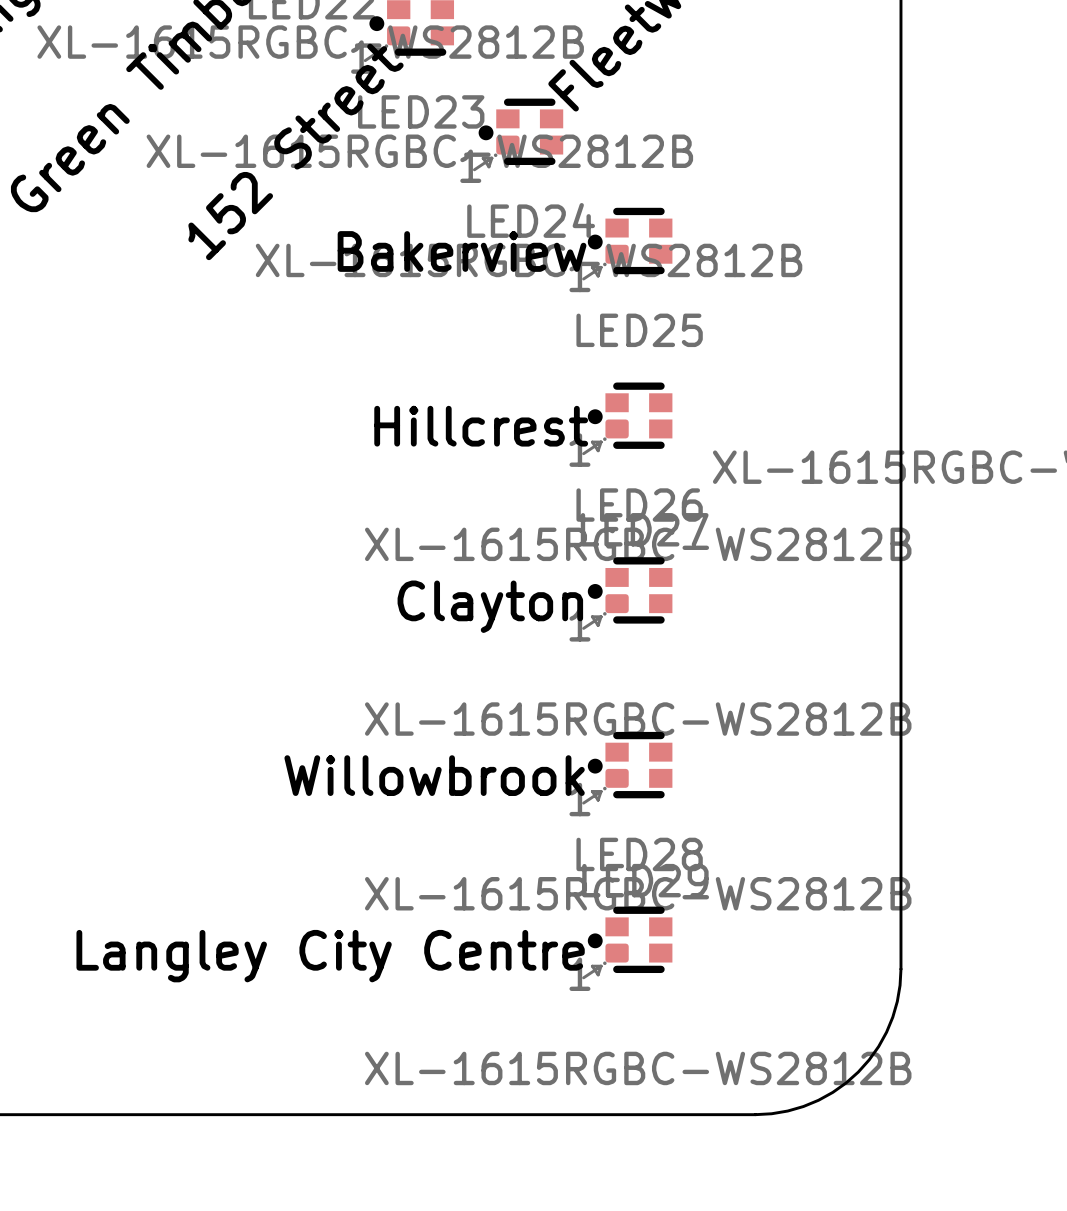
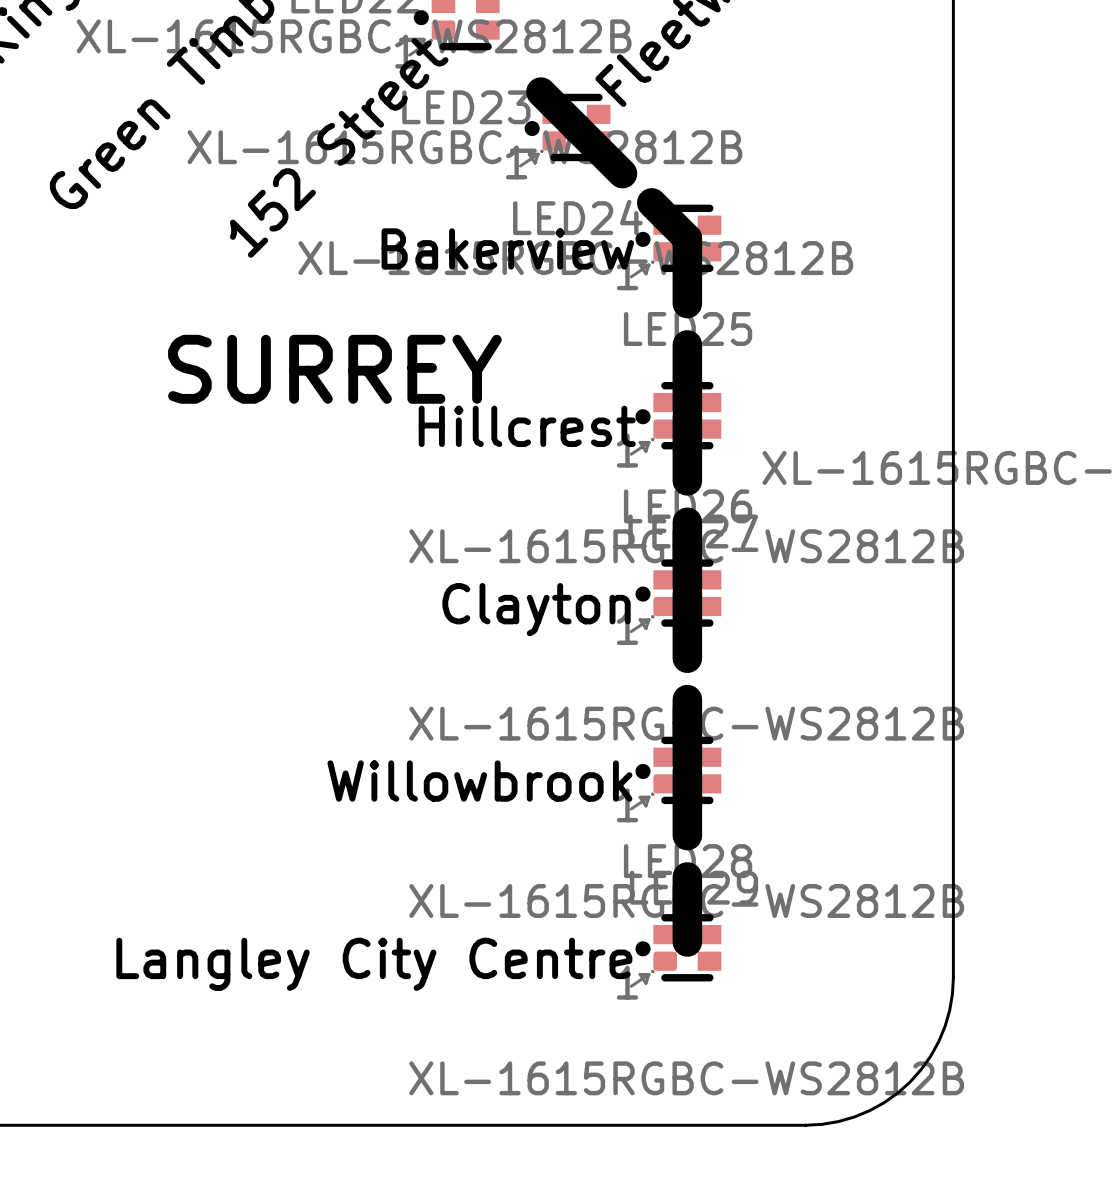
line: none -> (540, 92) (622, 173)
line: none -> (651, 202) (687, 238) (687, 303)
line: none -> (687, 344) (687, 409)
text: none -> SURREY (334, 369)
line: none -> (687, 415) (687, 480)
line: none -> (687, 522) (687, 587)
line: none -> (687, 593) (687, 658)
line: none -> (687, 699) (687, 764)
line: none -> (687, 770) (687, 835)
line: none -> (687, 876) (687, 942)

